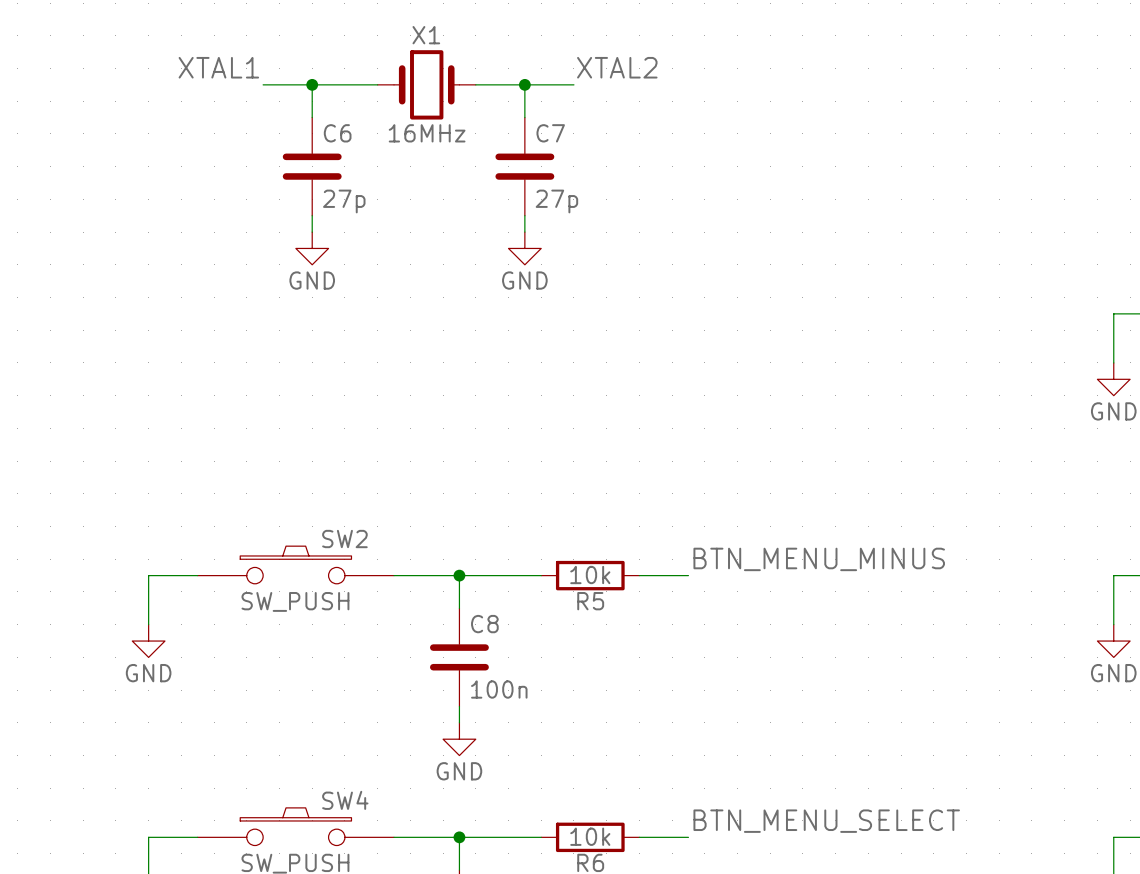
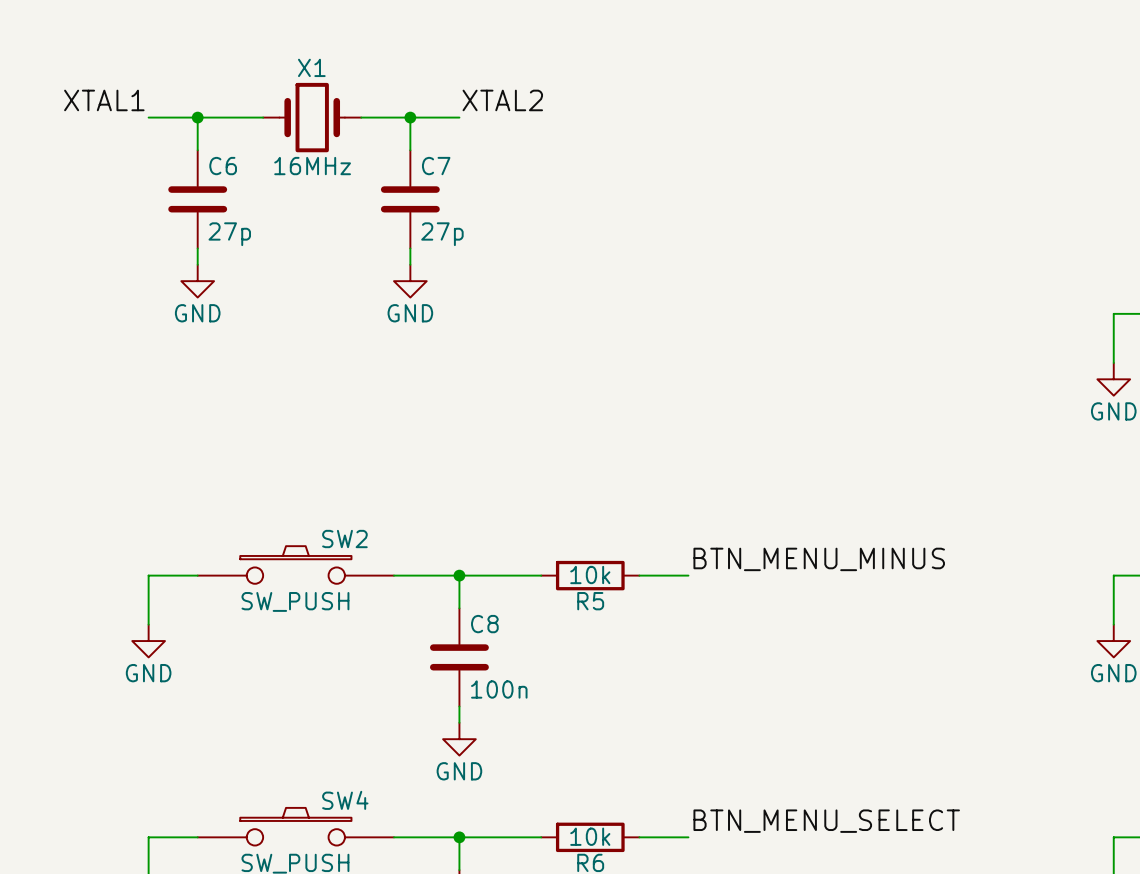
label position: XTAL1 (218, 67) -> XTAL1 (104, 100)
label position: XTAL2 (617, 67) -> XTAL2 (502, 100)
wire: (263, 84) (377, 84) -> (148, 117) (263, 117)
wire: (312, 84) (312, 117) -> (197, 117) (197, 150)
junction: (312, 84) -> none
X1 position: (426, 84) -> (312, 117)
wire: (475, 84) (573, 84) -> (361, 117) (459, 117)
wire: (524, 84) (524, 117) -> (410, 117) (410, 150)
junction: (524, 84) -> none
junction: none -> (197, 117)
junction: none -> (410, 117)
C6 position: (312, 166) -> (197, 199)
C7 position: (524, 166) -> (410, 199)
wire: (312, 215) (312, 232) -> (197, 248) (197, 264)
wire: (524, 215) (524, 232) -> (410, 248) (410, 264)
power symbol: GND (312, 248) -> none
power symbol: GND (524, 248) -> none
power symbol: none -> GND (197, 281)
power symbol: none -> GND (410, 281)

